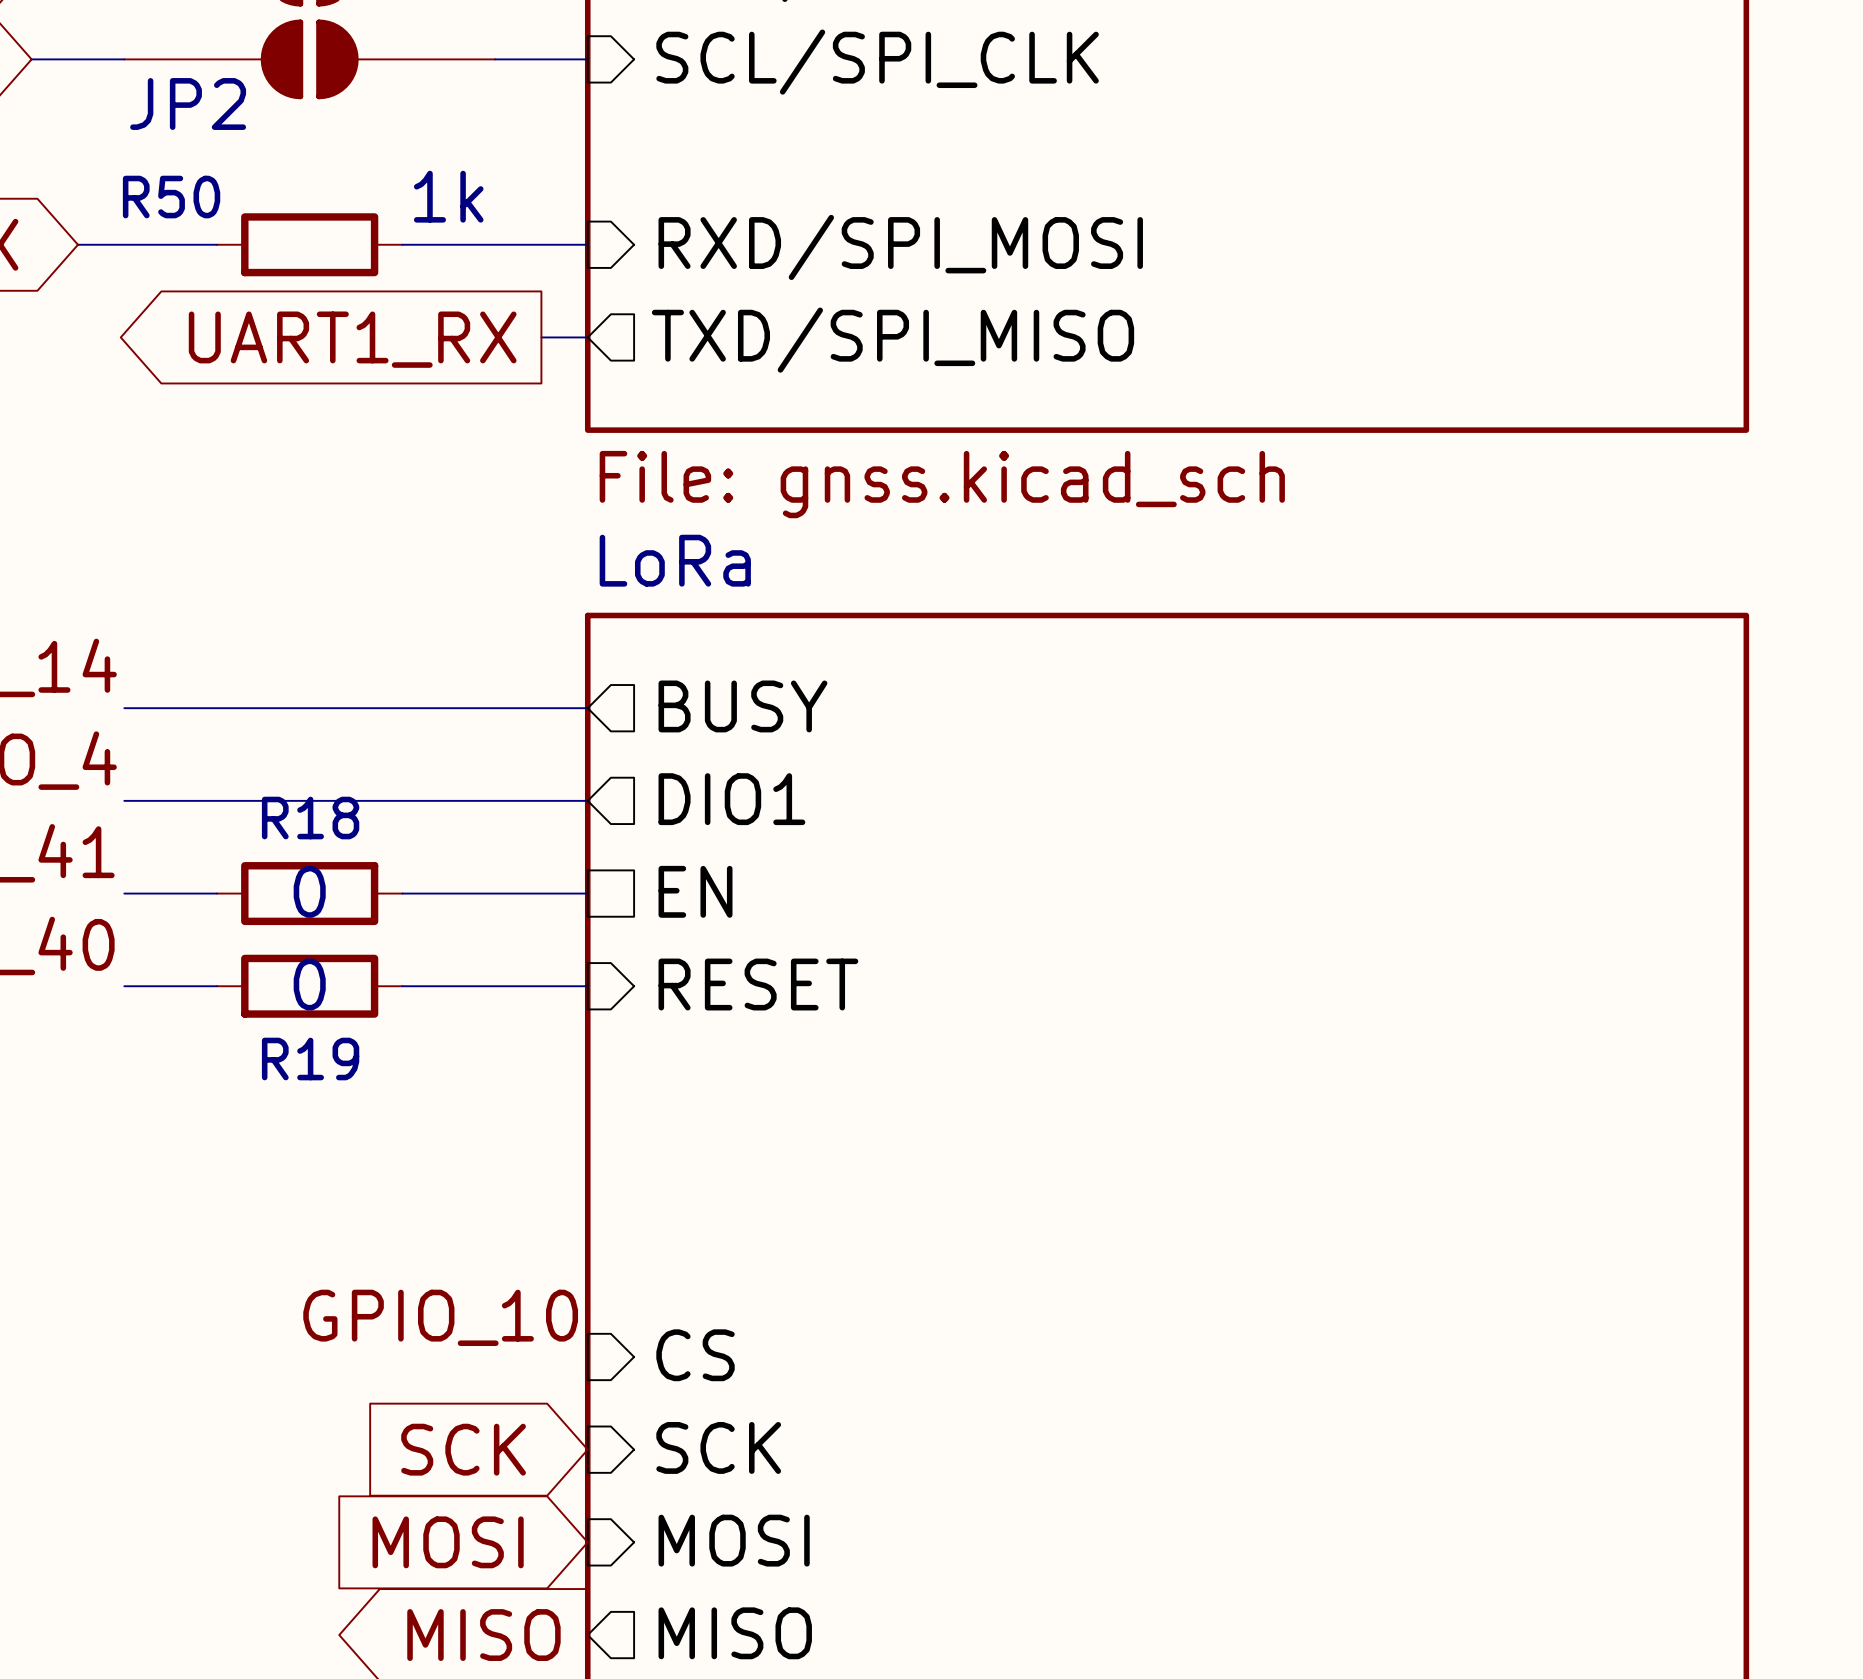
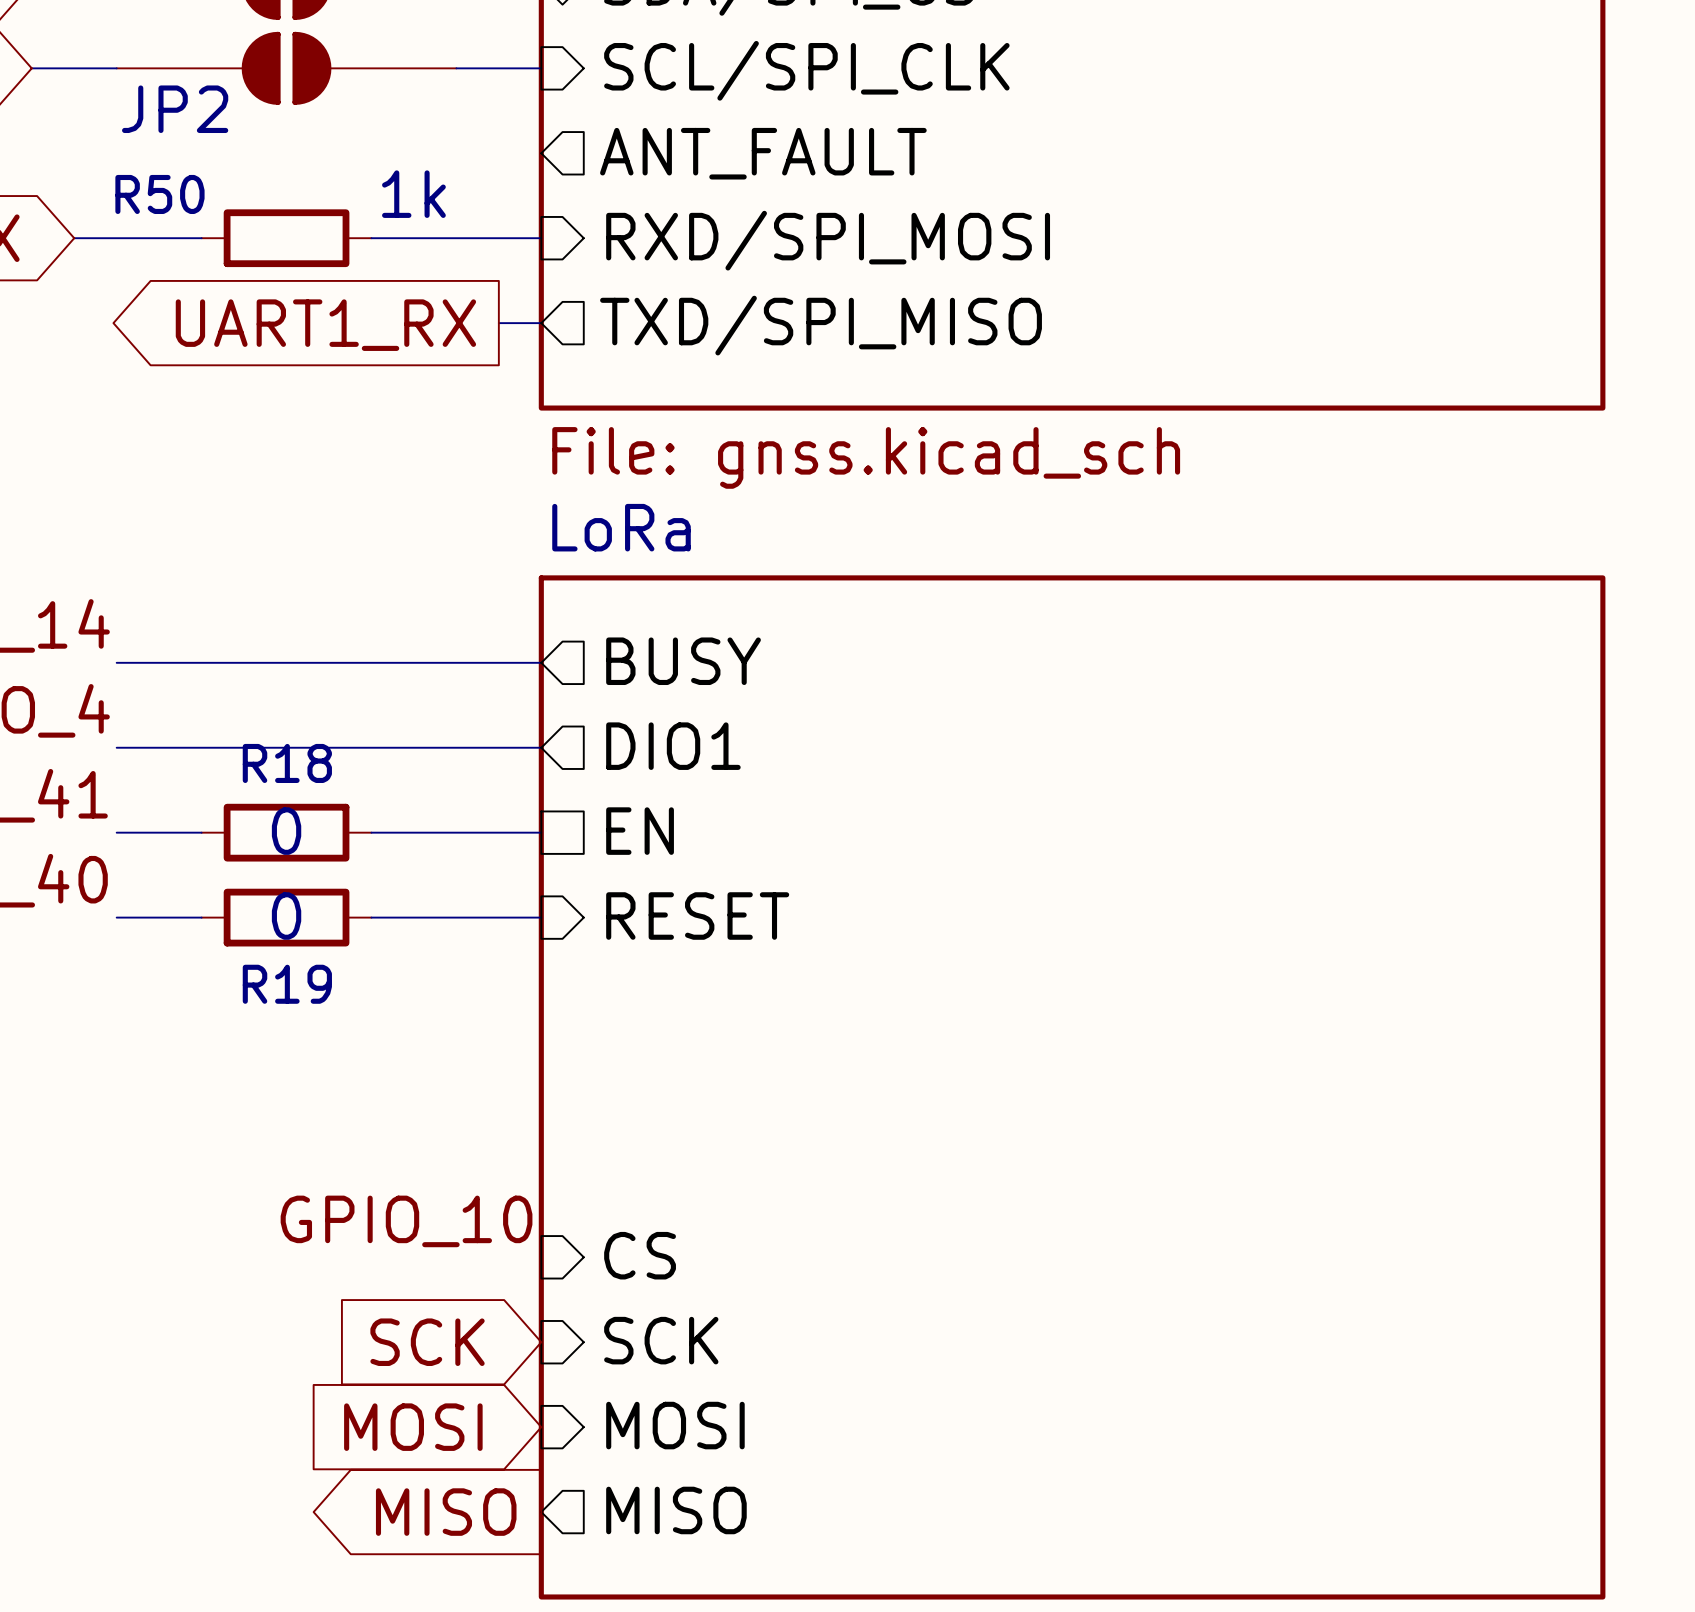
sheet pin: none -> ANT_FAULT (763, 153)

